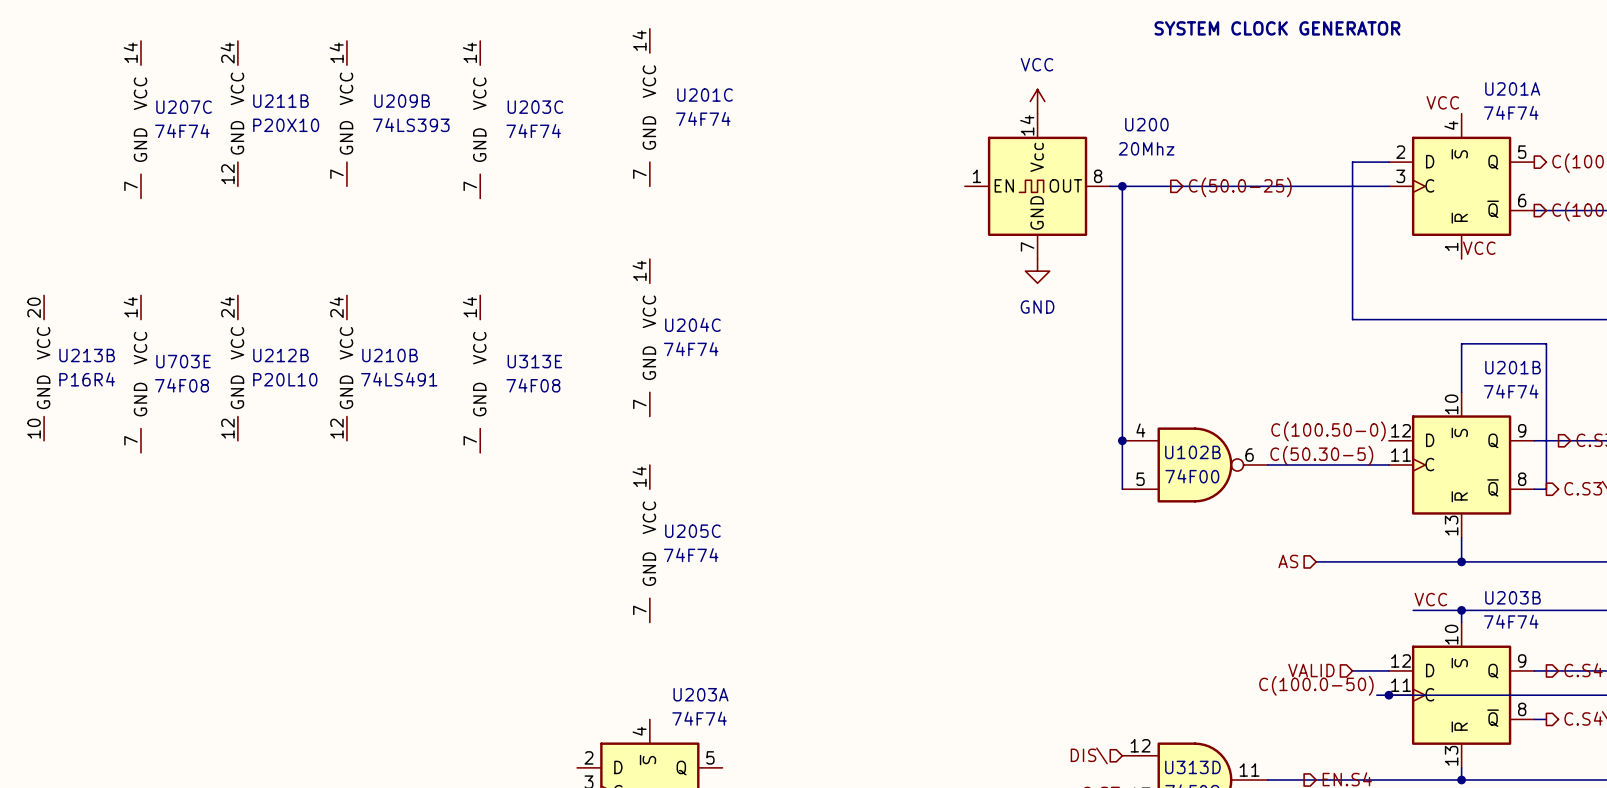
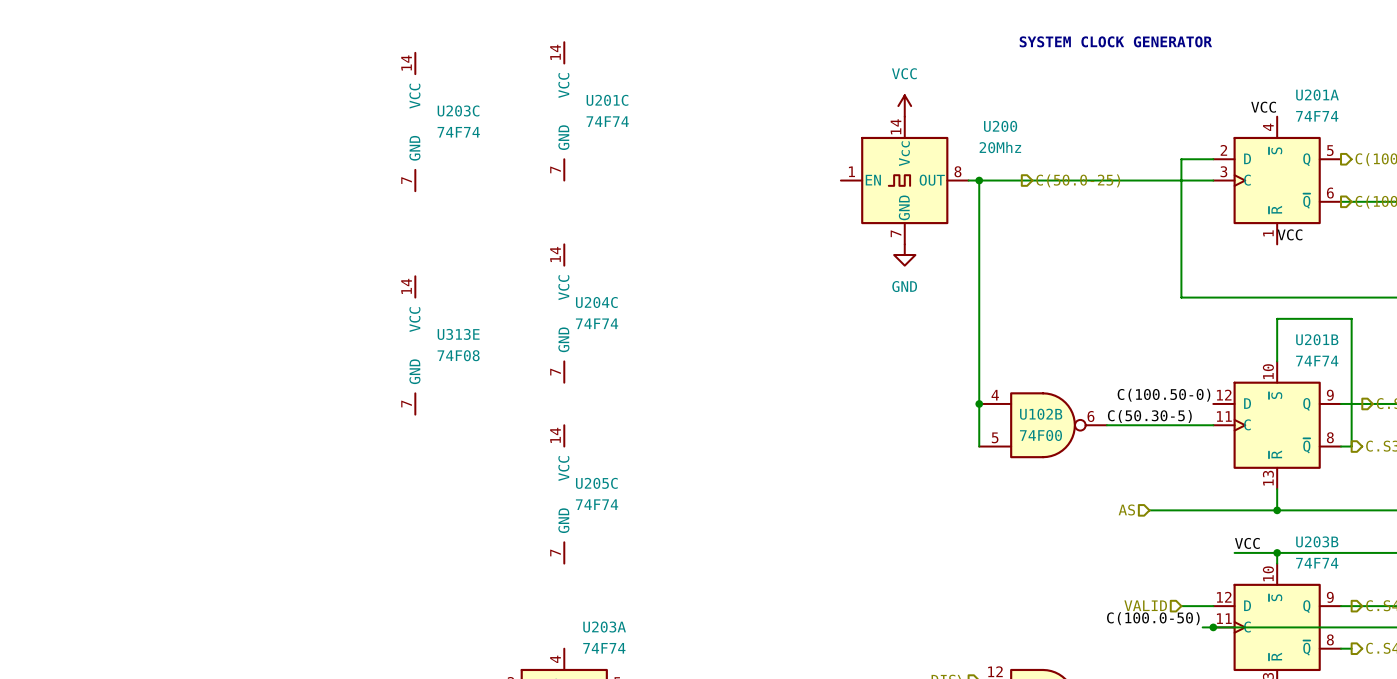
U211B: P20X10 (237, 113) -> none
U209B: 74LS393 (346, 113) -> none
U207C: 74F74 (140, 119) -> none
U213B: P16R4 (44, 368) -> none
U212B: P20L10 (237, 368) -> none
U210B: 74LS491 (346, 368) -> none
U703E: 74F08 (140, 374) -> none

